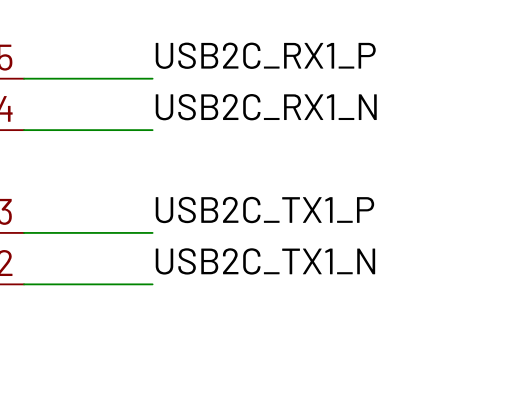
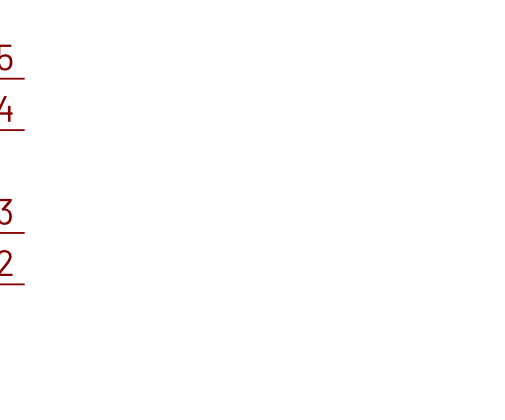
label: USB2C_RX1_P (265, 55) -> none
wire: (24, 78) (152, 78) -> none
label: USB2C_RX1_N (266, 107) -> none
wire: (24, 130) (152, 130) -> none
label: USB2C_TX1_P (264, 210) -> none
wire: (24, 232) (152, 232) -> none
label: USB2C_TX1_N (265, 261) -> none
wire: (24, 284) (152, 284) -> none

